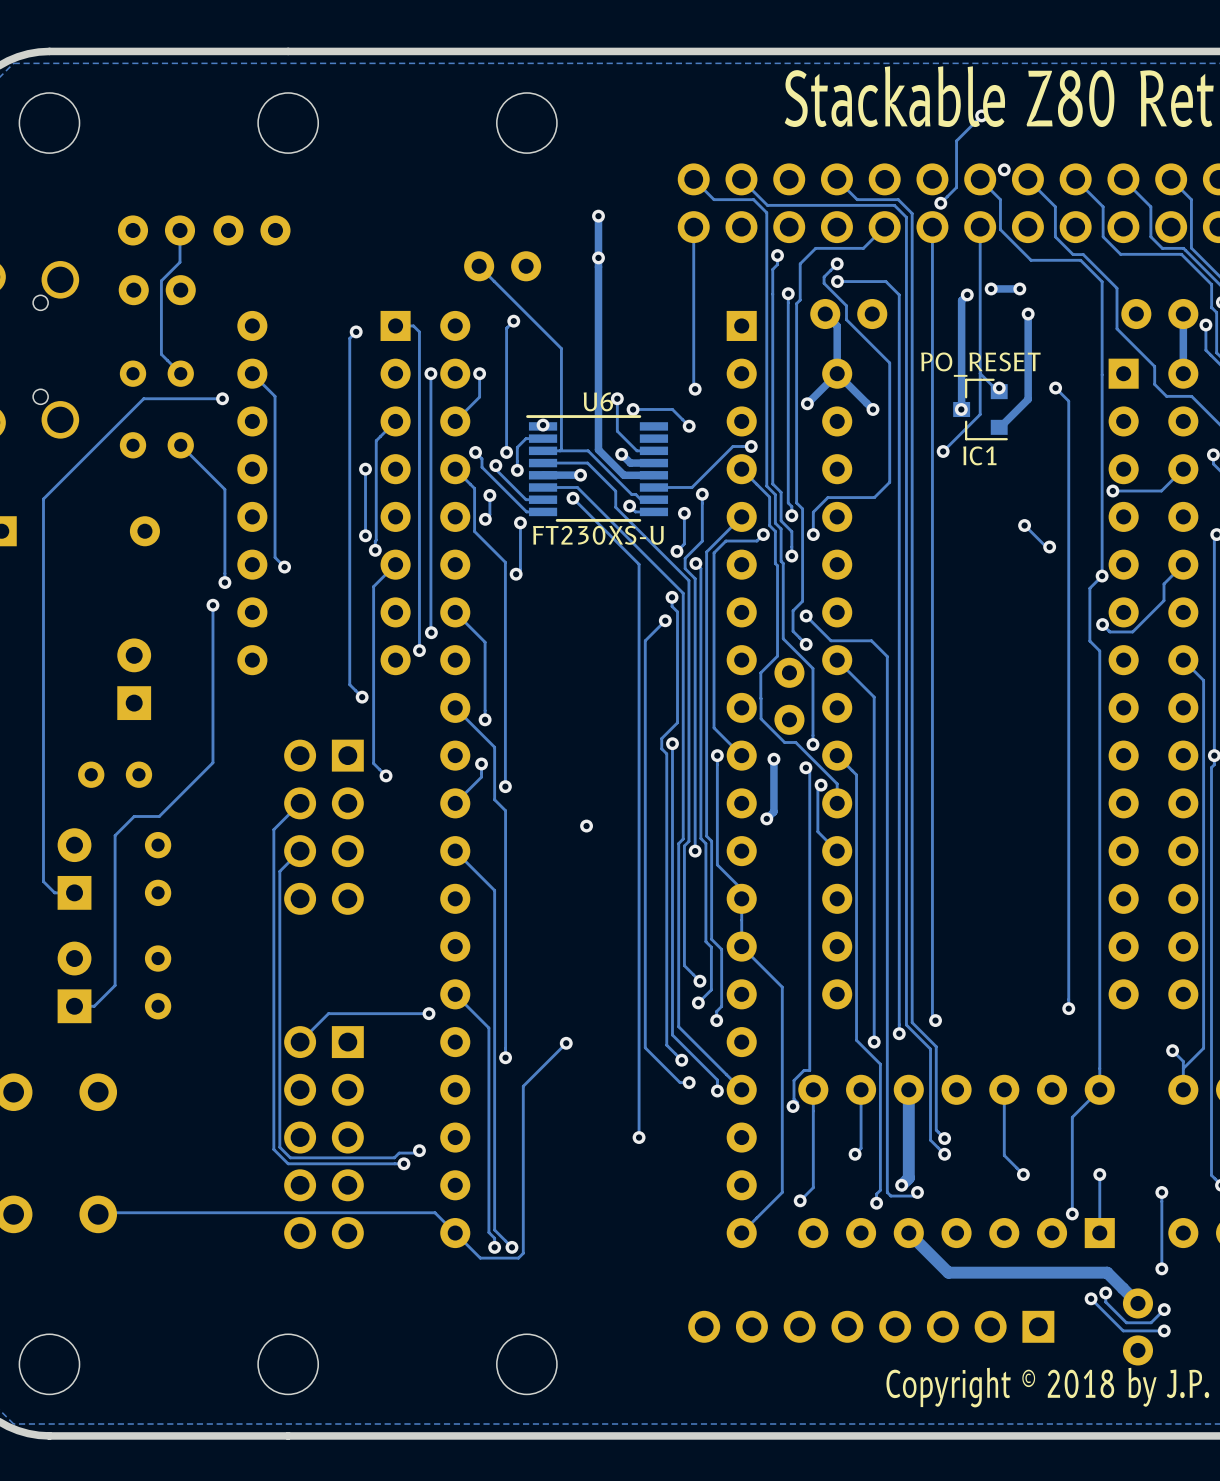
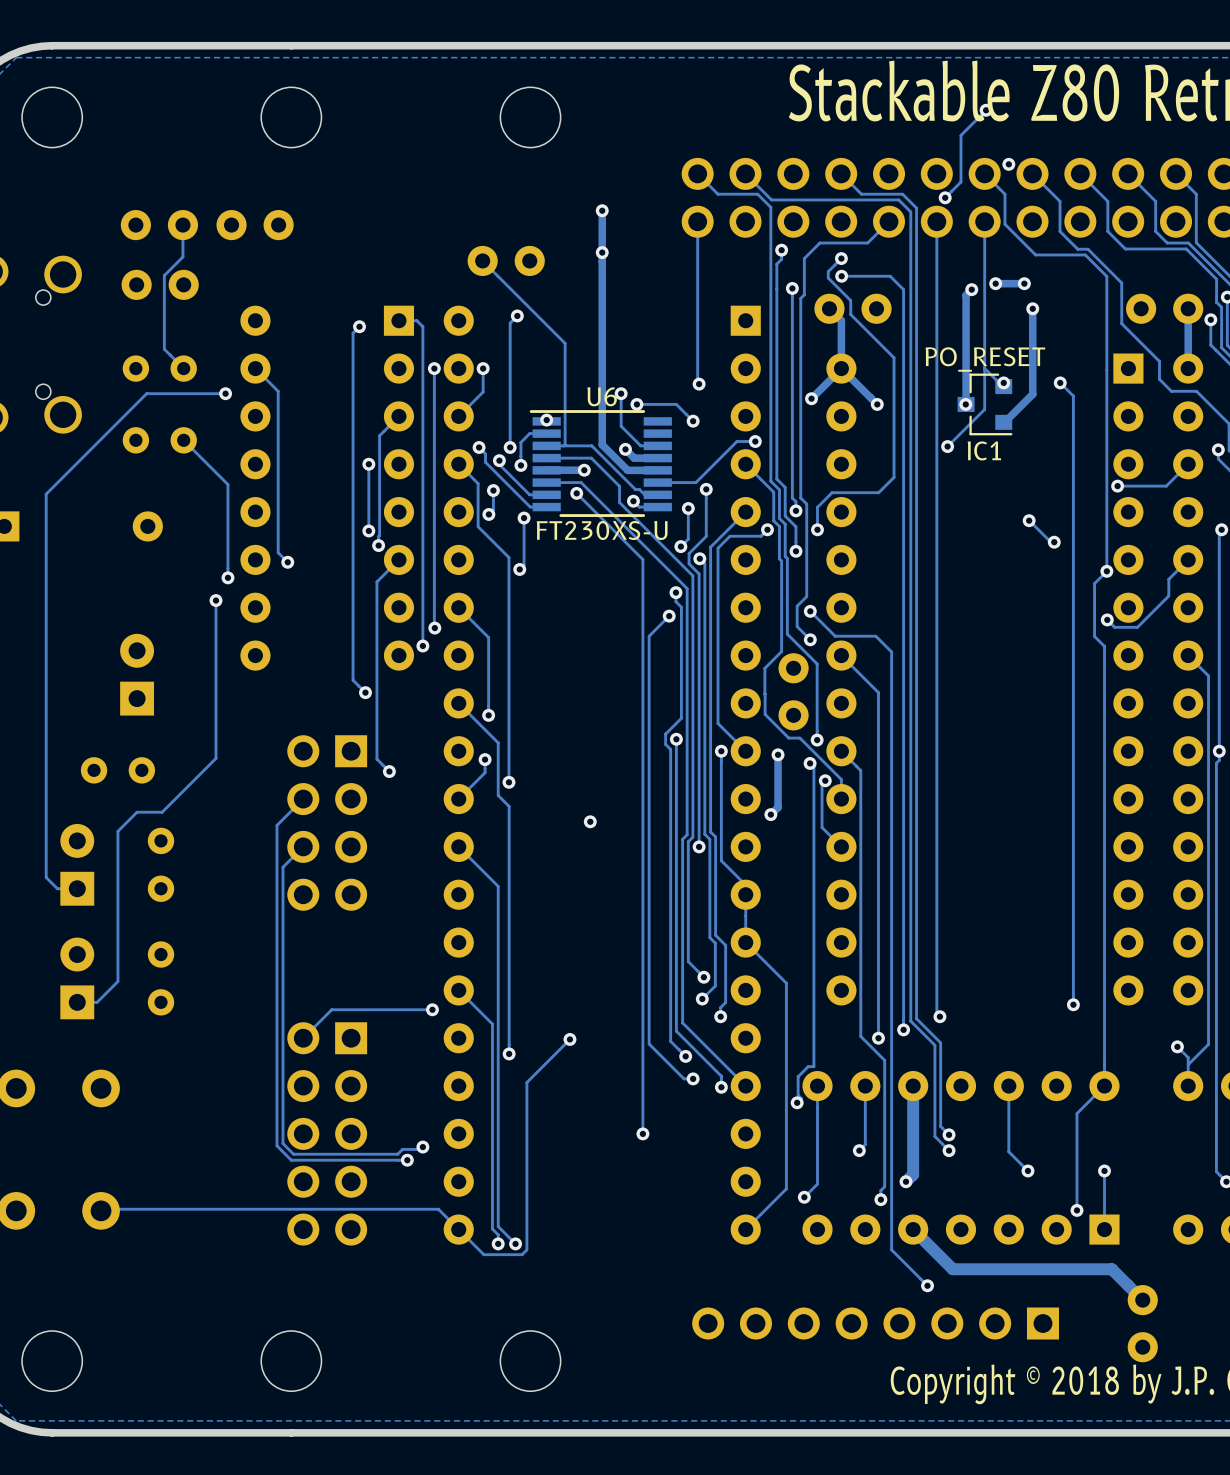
track: (917, 1192) (913, 1196) (890, 1196) (887, 1192) -> (927, 1285) (891, 1249) (891, 1188)
via: (917, 1192) -> none
track: (1161, 1192) (1161, 1268) -> none
via: (1161, 1192) -> none
via: (1161, 1268) -> none
via: none -> (927, 1285)
track: (1105, 1292) (1105, 1302) (1126, 1322) (1151, 1322) (1164, 1309) -> none
via: (1105, 1292) -> none
track: (1091, 1298) (1123, 1330) (1164, 1330) -> none
via: (1091, 1298) -> none
via: (1164, 1309) -> none
via: (1164, 1330) -> none

